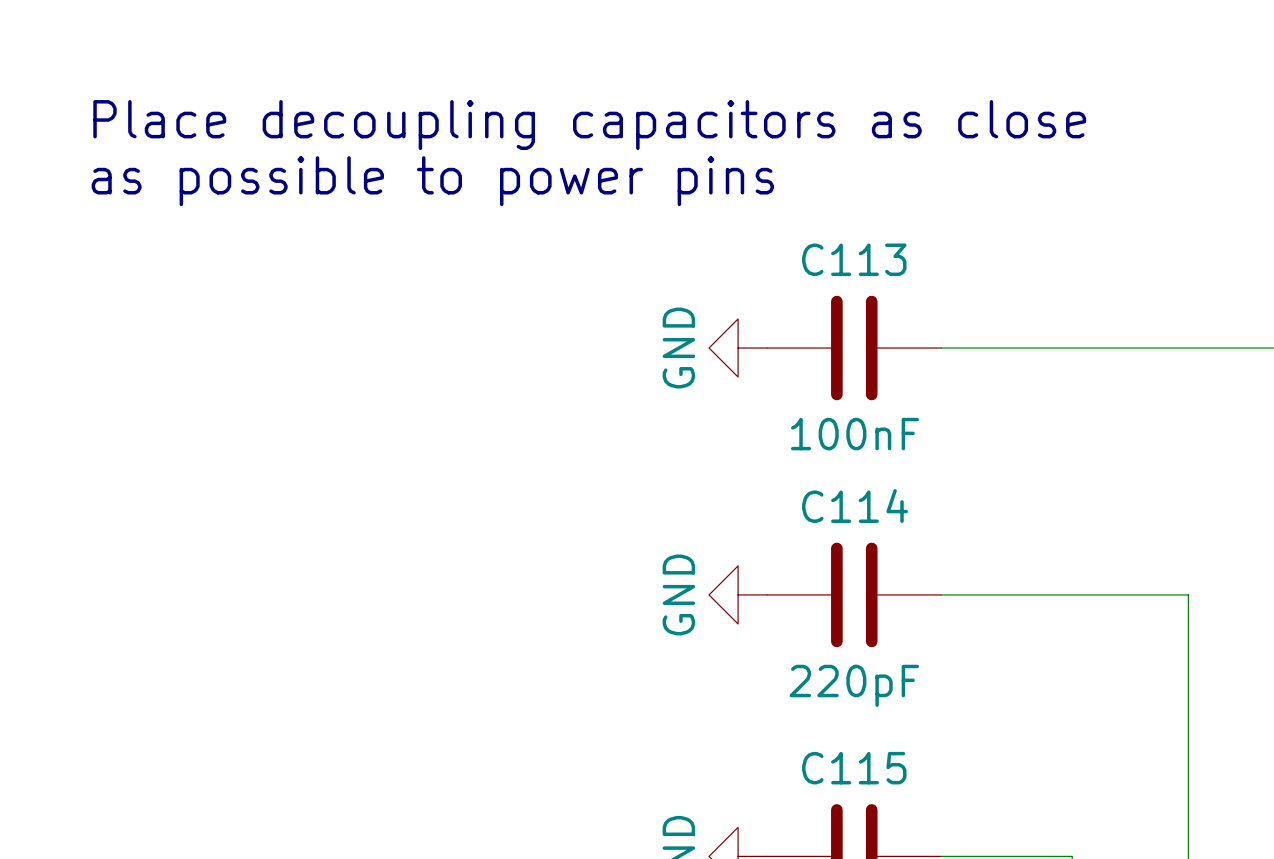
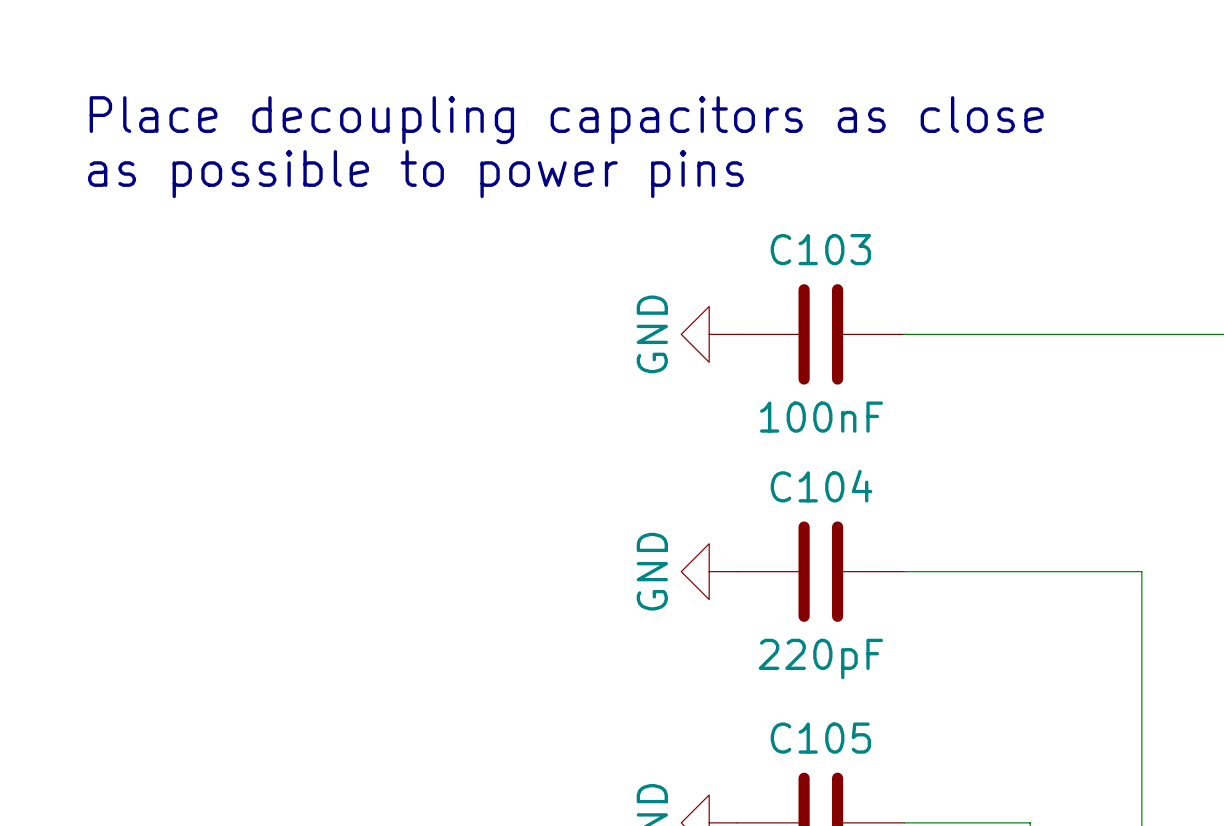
C113 name: C113 (854, 259) -> C103 (820, 249)
C114 name: C114 (854, 506) -> C104 (821, 486)
C115 name: C115 (854, 768) -> C105 (820, 738)

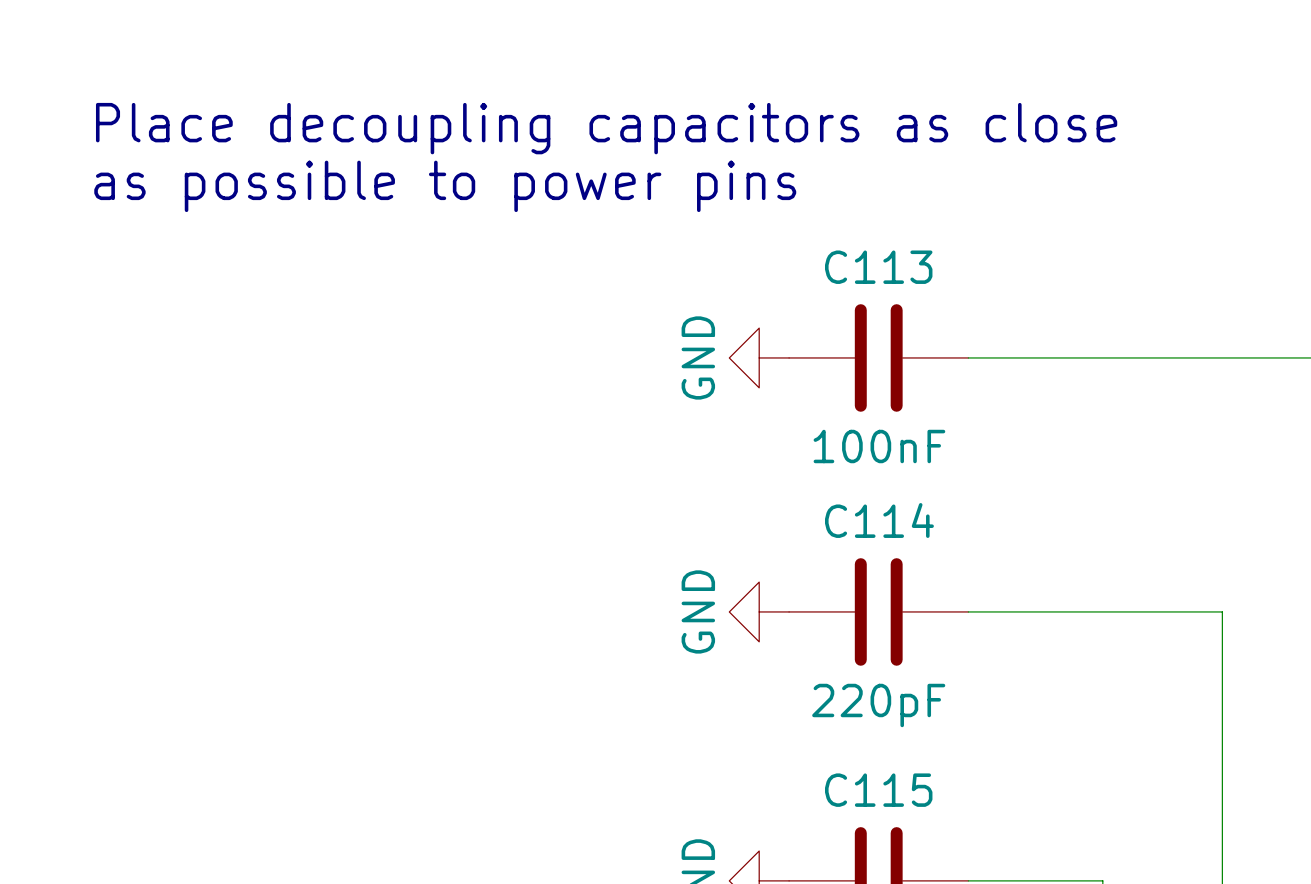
C103 name: C103 (820, 249) -> C113 (878, 267)
C104 name: C104 (821, 486) -> C114 (879, 520)
C105 name: C105 (820, 738) -> C115 (878, 790)

